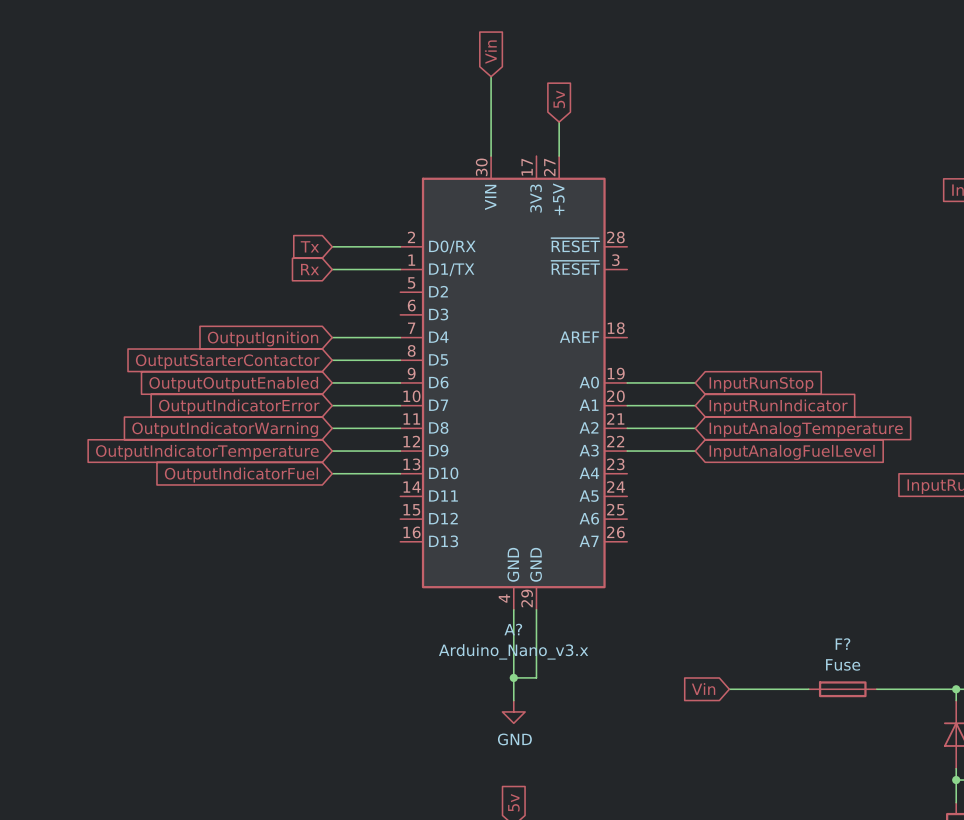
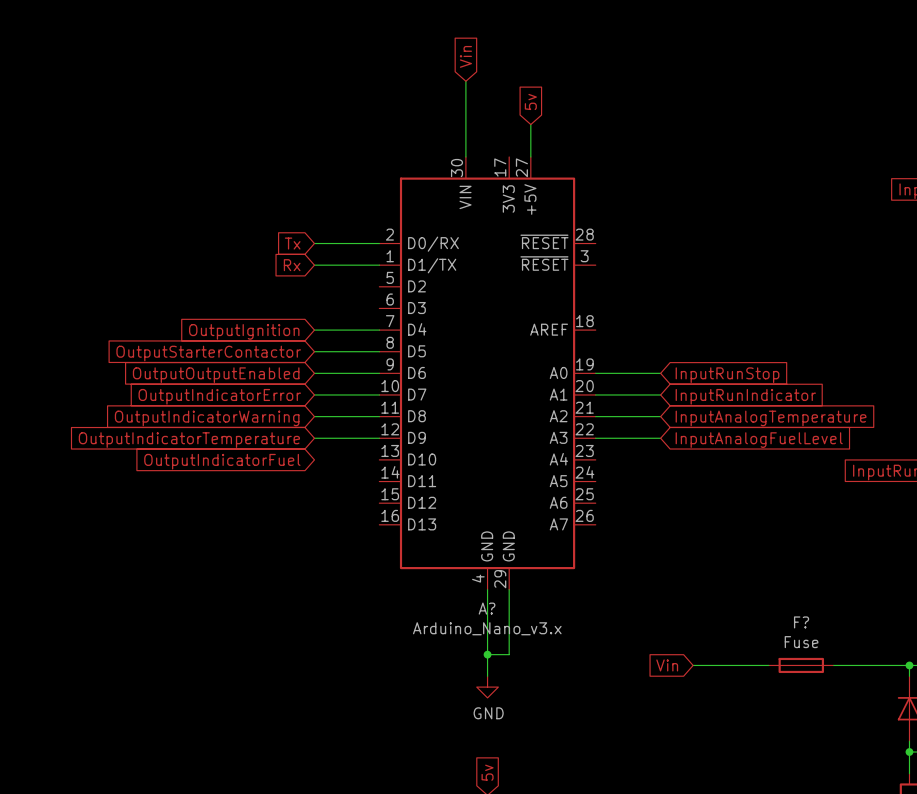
wire: (332, 473) (400, 473) -> none

